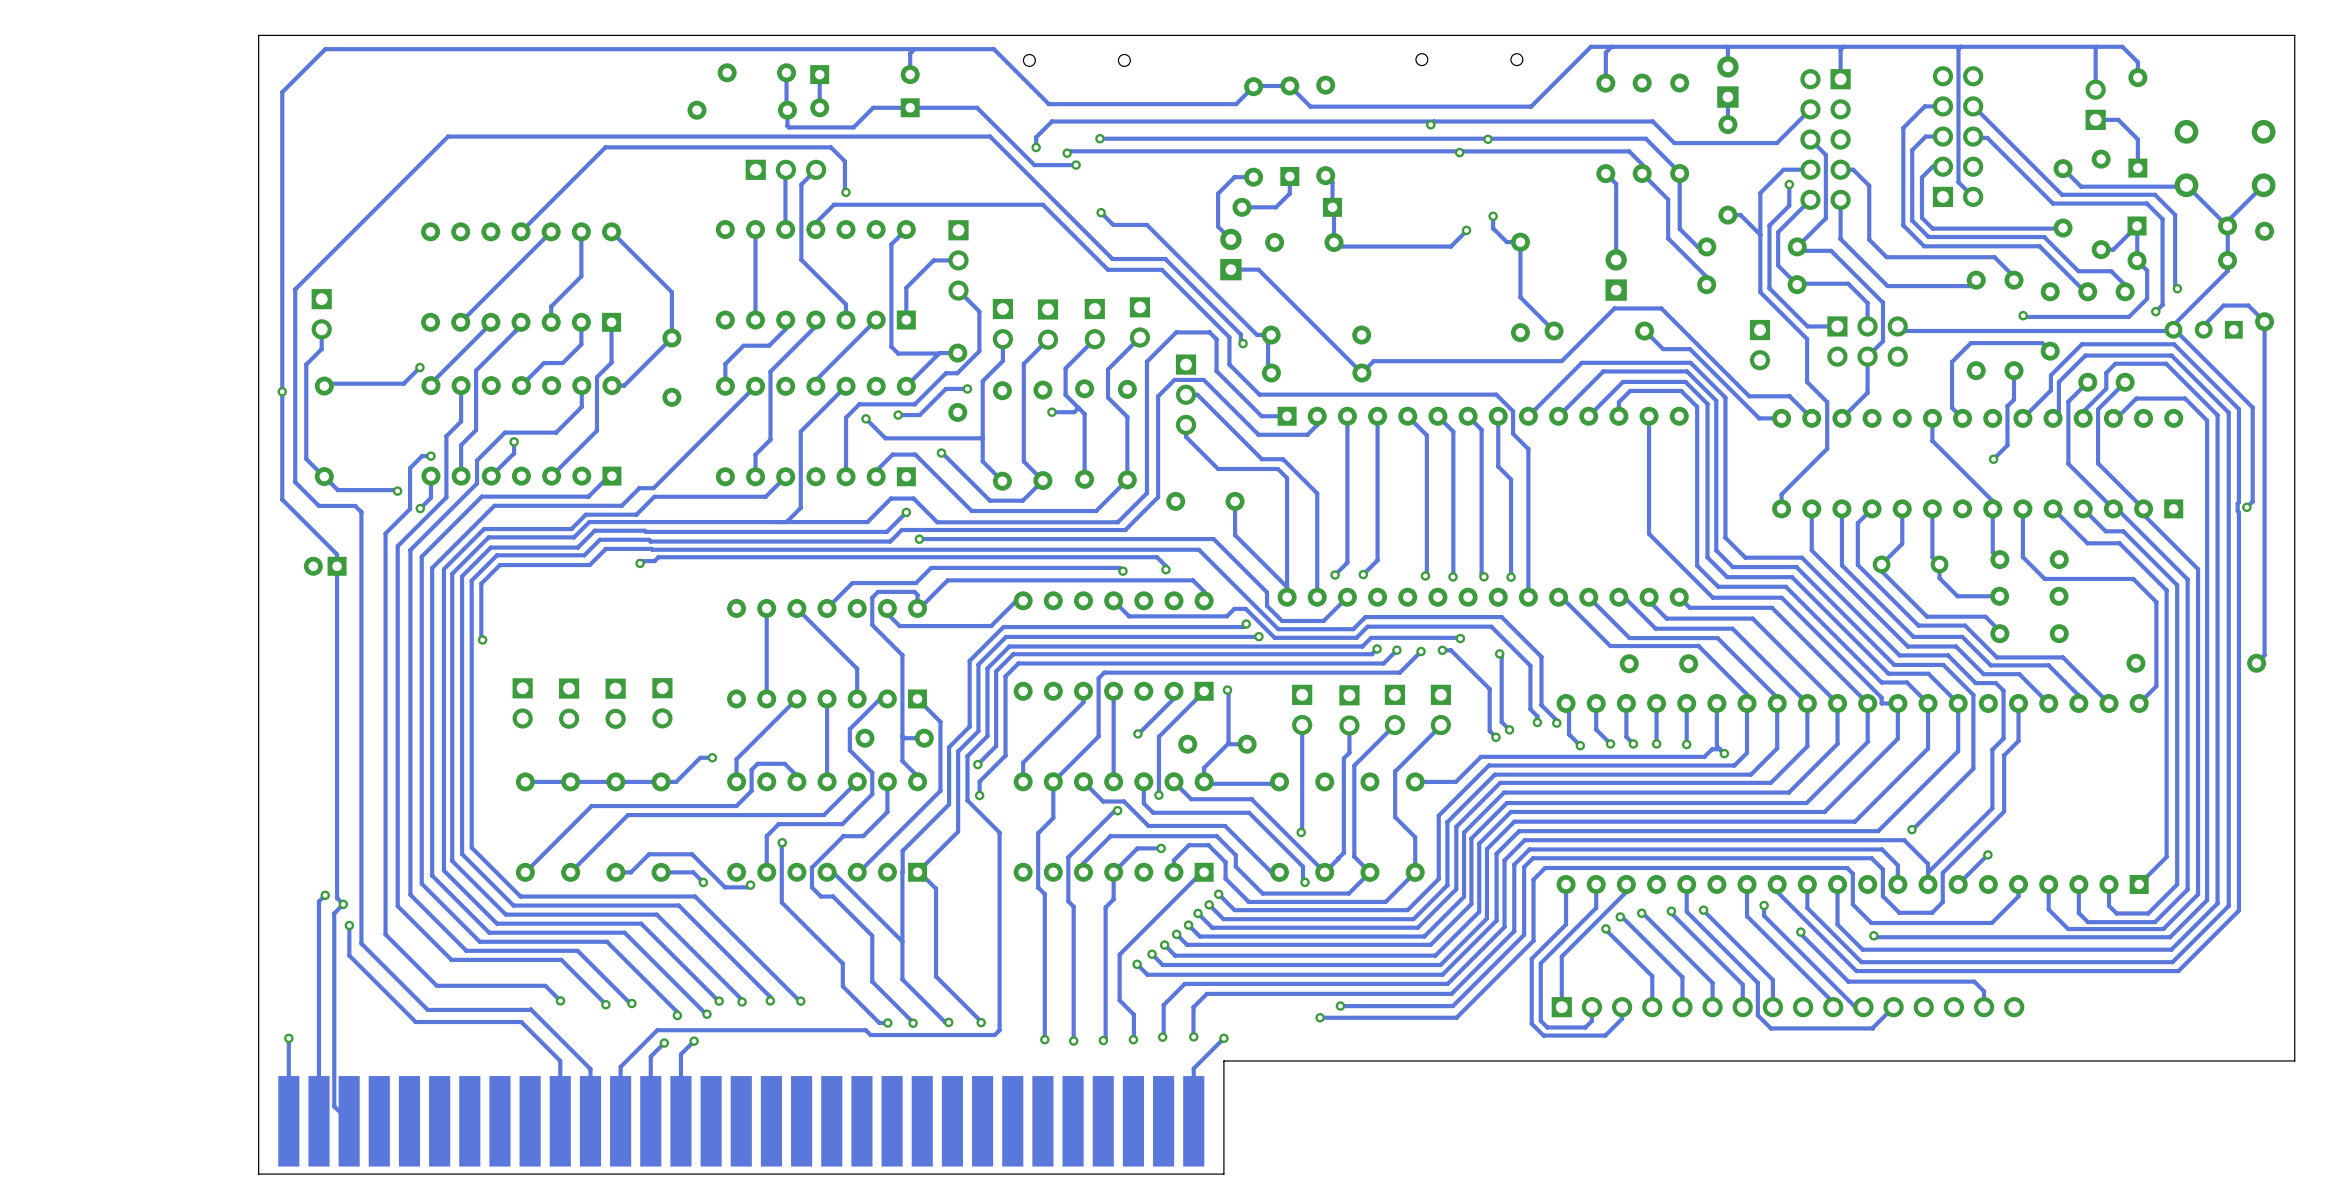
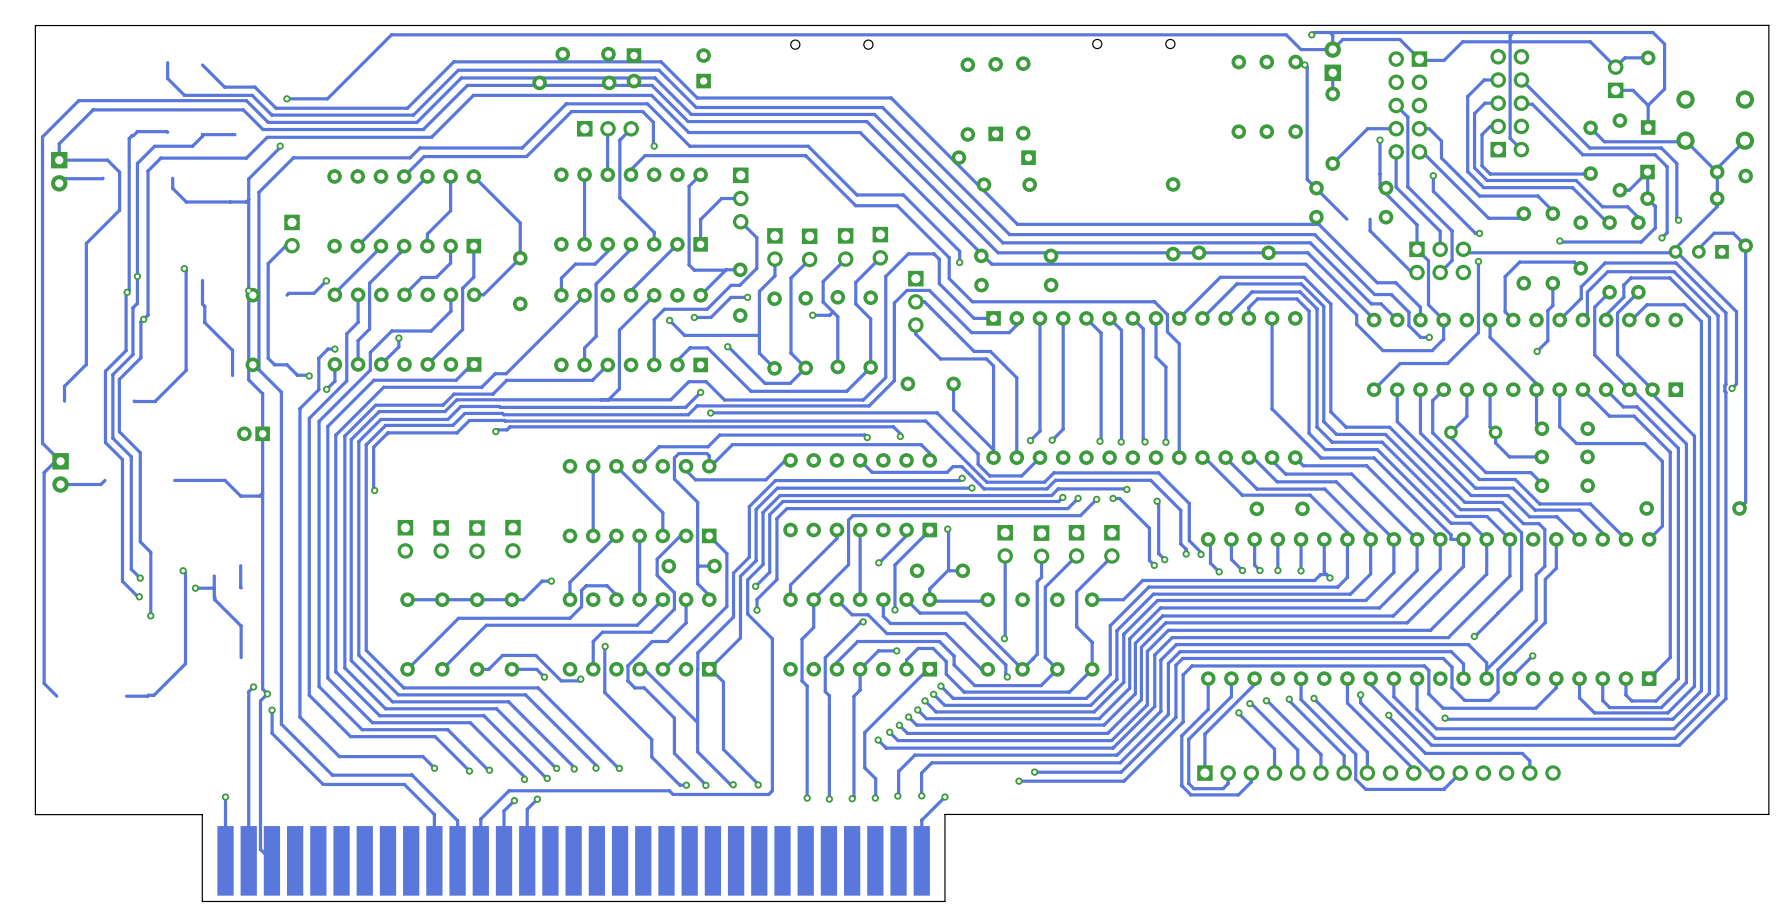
board edge: (2294, 35) (258, 35) (258, 1061) -> (1768, 25) (35, 25) (35, 814) (202, 814)
track: (1611, 46) (1605, 52) (1605, 83) -> none
track: (1843, 46) (1840, 49) (1840, 79) -> none
track: (2096, 46) (2095, 89) -> none
track: none -> (1311, 34) (1314, 32) (1652, 32) (1664, 44) (1664, 89) (1648, 105)
via: none -> (1311, 34)
track: (914, 49) (910, 53) (910, 74) -> none
track: (786, 72) (786, 109) (788, 127) (853, 127) (873, 107) (977, 107) (1034, 165) (1076, 165) -> none
track: (819, 74) (819, 107) -> none
track: (2137, 77) (2137, 62) (2122, 46) (1590, 46) (1531, 106) (1310, 106) (1289, 85) (1253, 86) (1236, 104) (1048, 104) (993, 49) (325, 49) (282, 92) (282, 499) (337, 554) -> (1648, 57) (1624, 57) (1615, 67) (1590, 41) (1462, 41) (1444, 60) (1420, 60) (1399, 39) (1342, 39) (1332, 49) (1301, 49) (1286, 34) (391, 34) (327, 98) (286, 98)
track: none -> (167, 62) (167, 78) (184, 95) (252, 95) (271, 115) (413, 115) (458, 70) (658, 70) (696, 107) (882, 107) (1009, 234) (1314, 234) (1374, 294) (1391, 294) (1408, 312) (1408, 325) (1420, 337) (1429, 337)
track: none -> (1304, 65) (1307, 67) (1307, 179) (1346, 219)
via: none -> (1304, 65)
track: (1810, 109) (1776, 143) (1674, 143) (1652, 121) (1051, 121) (1036, 137) (1036, 147) -> none
via: (1430, 124) -> none
via: none -> (286, 98)
track: (1099, 138) (1645, 138) (1679, 172) (1679, 228) (1697, 246) (1706, 246) -> none
via: (1099, 138) -> none
via: (1488, 139) -> none
track: (738, 147) (605, 147) (546, 205) -> (571, 111) (526, 156) (424, 156)
via: (1036, 147) -> none
via: (1459, 152) -> none
via: (1067, 153) -> none
track: (1460, 153) (1462, 151) (1629, 151) (1642, 164) (1642, 173) (1668, 199) (1668, 238) (1706, 276) (1706, 284) -> none
track: (1460, 153) (1458, 151) (1069, 151) (1067, 153) -> none
track: (1825, 154) (1825, 218) (1797, 246) -> (1407, 117) (1407, 186) (1412, 191)
via: (1076, 165) -> none
track: (1783, 169) (1760, 192) (1760, 292) (1807, 339) (1807, 382) (1827, 402) (1827, 448) (1781, 494) (1781, 508) -> (1478, 261) (1478, 332) (1447, 363) (1400, 363) (1374, 389)
track: (1605, 173) (1616, 183) (1616, 259) -> none
track: none -> (167, 132) (137, 131) (129, 138) (129, 290) (126, 293) (126, 350) (105, 371) (105, 442) (122, 459) (122, 581) (139, 596)
track: (1325, 175) (1332, 182) (1334, 242) (1338, 246) (1450, 246) (1466, 230) -> none
track: (1289, 176) (1289, 193) (1275, 207) (1242, 207) -> none
track: none -> (234, 134) (202, 134) (192, 146) (154, 146) (137, 163) (137, 303) (132, 307) (132, 354) (112, 374) (112, 438) (131, 456) (131, 569) (140, 578)
track: (1253, 177) (1234, 177) (1218, 193) (1218, 226) (1230, 239) -> none
track: none -> (280, 146) (248, 178) (248, 379) (262, 393) (262, 424)
via: none -> (280, 146)
track: (1810, 199) (1778, 232) (1778, 265) (1797, 284) (1848, 283) -> (1396, 152) (1396, 187) (1425, 216)
track: (1840, 199) (1840, 238) (1887, 286) (1930, 286) -> (1419, 151) (1422, 151) (1488, 218)
track: (1789, 205) (1769, 225) (1769, 288) (1807, 326) (1837, 326) -> (1379, 156) (1379, 173)
track: (377, 207) (448, 136) (990, 136) (1112, 259) (1165, 259) (1240, 334) (1240, 341) (1243, 343) -> (293, 157) (410, 157) (419, 147) (522, 147) (566, 103) (647, 103) (689, 146) (808, 146) (856, 194) (903, 194) (959, 251) (959, 262)
track: (1869, 207) (1869, 239) (1886, 257) (1918, 257) -> (1441, 158) (1479, 196)
track: (1101, 212) (1113, 224) (1146, 224) (1257, 335) (1271, 335) (1268, 338) (1268, 369) (1271, 373) -> none
via: (1101, 212) -> none
track: (1727, 215) (1740, 215) (1760, 234) -> (1332, 163) (1367, 128) (1375, 128)
track: (1493, 216) (1493, 228) (1506, 242) (1520, 242) (1520, 297) (1554, 331) -> none
via: (1493, 216) -> none
part: none -> (59, 171)
track: none -> (1380, 174) (1380, 187) (1416, 224) (1416, 249) (1428, 260) (1428, 304) (1443, 320) (1443, 339) (1432, 350) (1382, 350) (1356, 324) (1356, 315) (1305, 264) (991, 264) (860, 132) (688, 132) (651, 95) (473, 95) (431, 137) (267, 137) (246, 158) (160, 158) (148, 171) (148, 315) (140, 322) (140, 357) (119, 379) (119, 431) (140, 452) (140, 541) (150, 552) (150, 615)
via: (1466, 230) -> none
track: none -> (1433, 175) (1433, 191) (1475, 233) (1479, 233)
via: none -> (1433, 175)
track: none -> (103, 178) (63, 178) (59, 183)
track: none -> (172, 178) (172, 188) (186, 201) (246, 201) (248, 199)
track: (1831, 250) (1800, 250) -> none
track: (332, 252) (295, 289) (295, 482) (318, 505) (355, 505) -> (258, 192) (258, 369) (276, 387)
part: (1230, 254) -> none
track: (1230, 269) (1258, 269) (1361, 373) (1373, 361) (1561, 361) (1614, 308) (1661, 308) (1749, 396) (1790, 397) -> (56, 696) (44, 683) (44, 472) (55, 461) (60, 461) (42, 443) (42, 136) (78, 100) (246, 100) (268, 122) (416, 122) (461, 77) (654, 77) (691, 114) (874, 114) (1002, 242) (1310, 242) (1371, 303) (1381, 303)
part: (1616, 274) -> none
track: none -> (1370, 219) (1370, 230) (1411, 272) (1416, 272)
via: none -> (1479, 233)
part position: (321, 314) -> (292, 234)
track: (321, 329) (321, 349) (306, 364) (306, 458) (337, 490) (382, 490) -> (292, 245) (286, 245) (268, 263) (268, 358) (274, 364) (287, 364) (297, 375)
track: none -> (1268, 252) (998, 252) (866, 121) (688, 121) (651, 85) (467, 85) (423, 129) (262, 129) (243, 109) (93, 109) (59, 143) (59, 160) (107, 160) (119, 172) (119, 210) (86, 243) (86, 364) (64, 386) (64, 401)
track: (1645, 331) (1663, 349) (1690, 349) (1759, 418) (1781, 418) -> (1268, 252) (1307, 252) (1374, 320)
via: none -> (1478, 261)
part: (1759, 345) -> none
track: none -> (184, 268) (186, 270) (186, 370) (155, 401) (134, 401)
via: none -> (184, 268)
track: (1867, 356) (1867, 392) (1841, 418) -> (202, 65) (224, 87) (254, 87) (276, 108) (407, 108) (453, 61) (661, 61) (697, 98) (891, 98) (1017, 224) (1318, 224) (1377, 282) (1395, 282) (1420, 307) (1420, 320)
via: none -> (137, 276)
track: none -> (202, 280) (204, 322) (232, 350) (232, 375)
via: none -> (248, 290)
via: none -> (127, 292)
track: (371, 383) (326, 383) (324, 386) -> (288, 293) (287, 295)
via: (282, 391) -> none
via: none -> (143, 319)
via: none -> (1429, 337)
part: none -> (60, 472)
track: none -> (105, 480) (100, 484) (60, 484)
track: none -> (174, 480) (225, 480) (240, 496) (259, 496) (262, 493)
track: none -> (240, 565) (241, 587)
track: none -> (183, 570) (185, 573) (185, 663) (153, 695) (126, 696)
via: none -> (183, 570)
track: none -> (214, 575) (214, 599) (241, 626) (241, 657)
via: none -> (140, 578)
via: none -> (195, 588)
track: none -> (214, 588) (195, 588)
via: none -> (139, 596)
via: none -> (150, 615)

